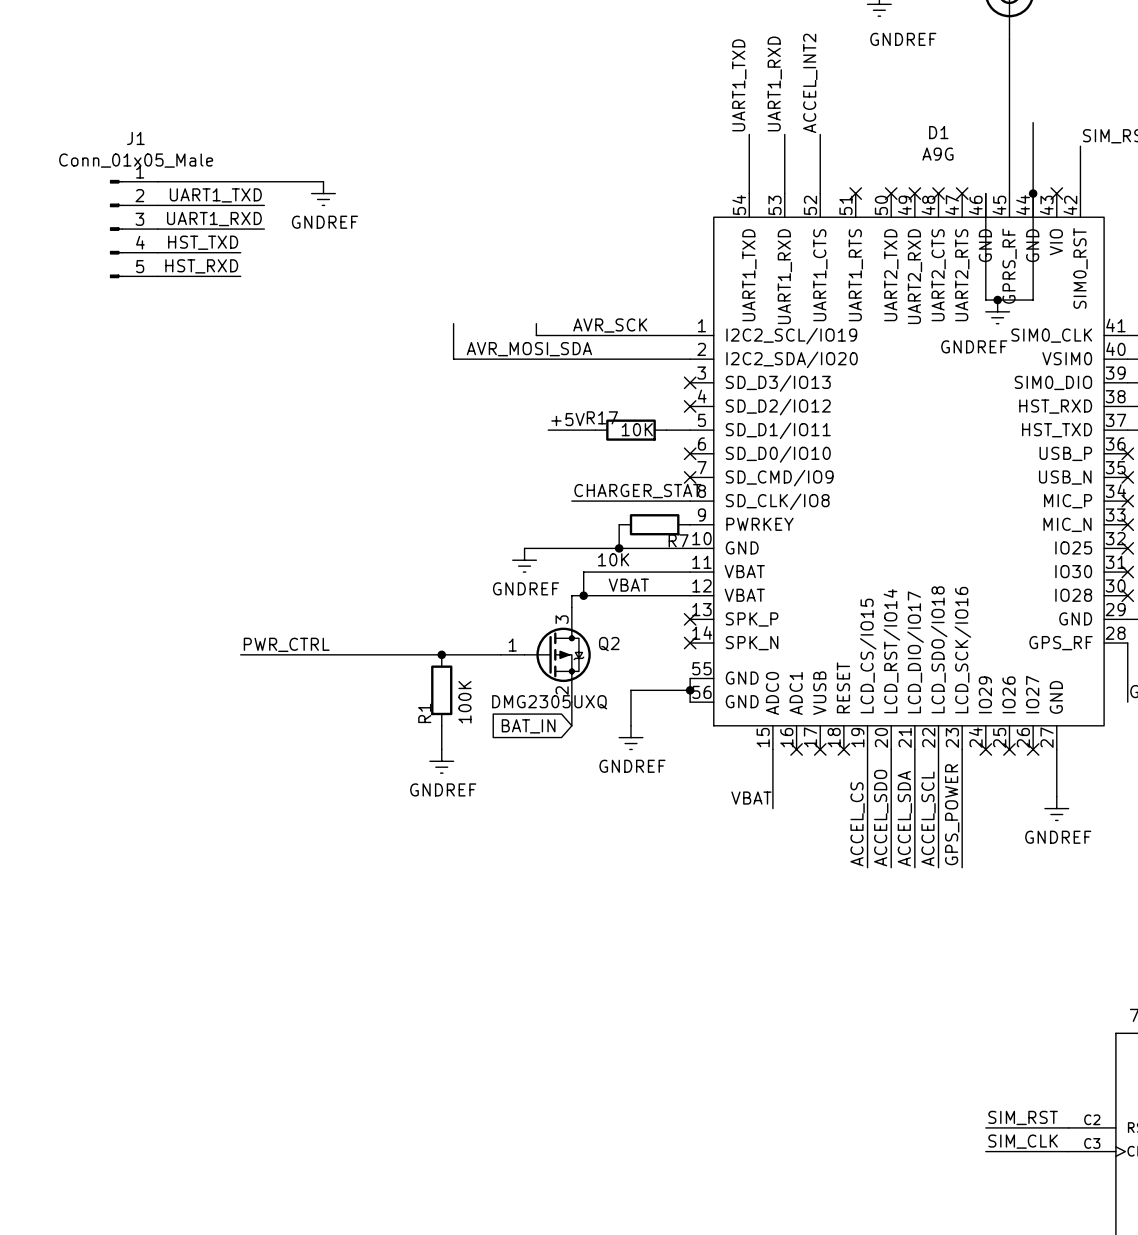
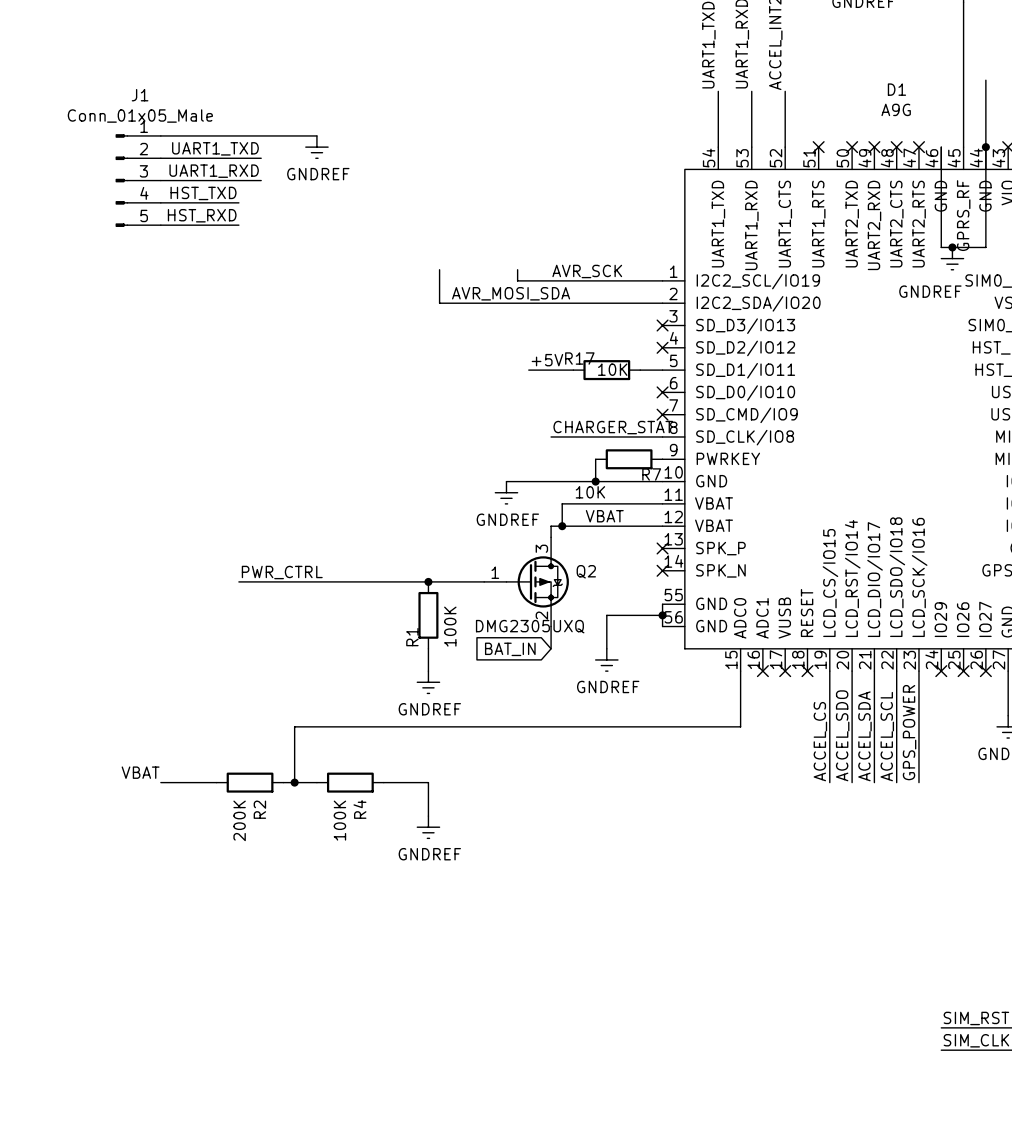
label: VBAT (751, 798) -> none
wire: none -> (740, 726) (294, 726) (294, 782)
label: none -> VBAT (140, 772)
wire: none -> (160, 782) (216, 782)
R2: none -> 200K (250, 782)
wire: none -> (283, 782) (316, 782)
junction: none -> (294, 782)
R4: none -> 100K (350, 782)
wire: none -> (383, 782) (428, 782) (428, 816)
power symbol: none -> GNDREF (428, 827)

